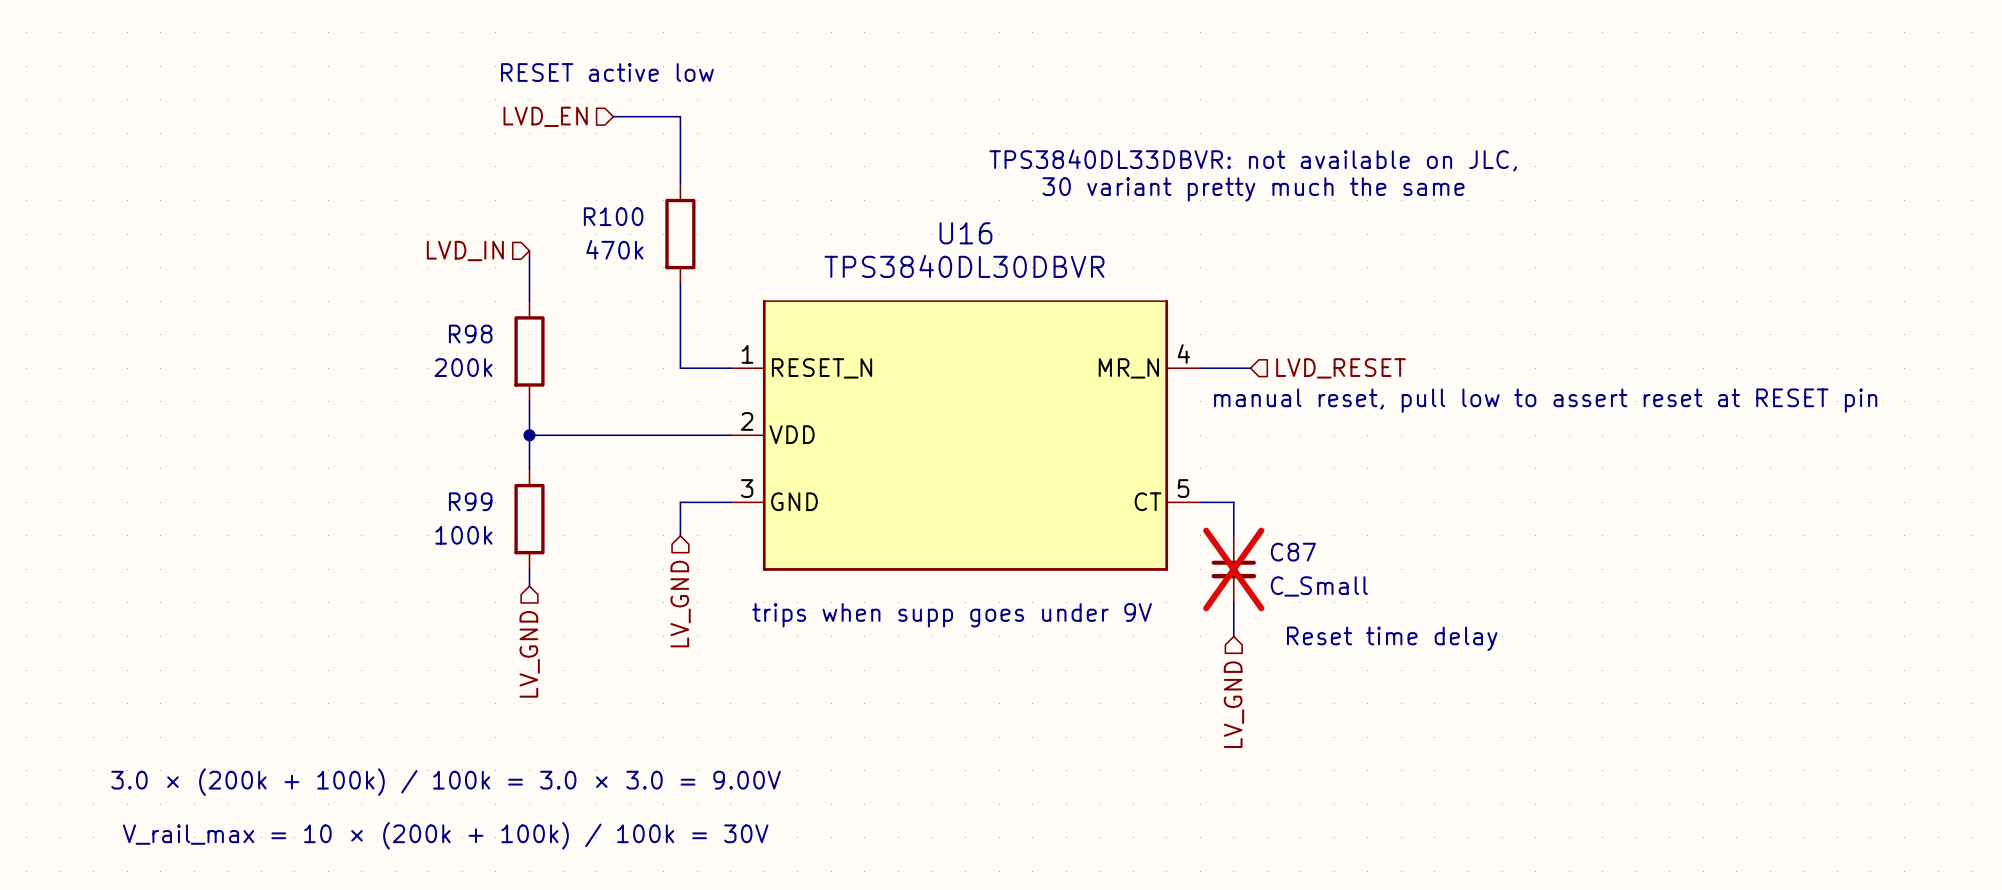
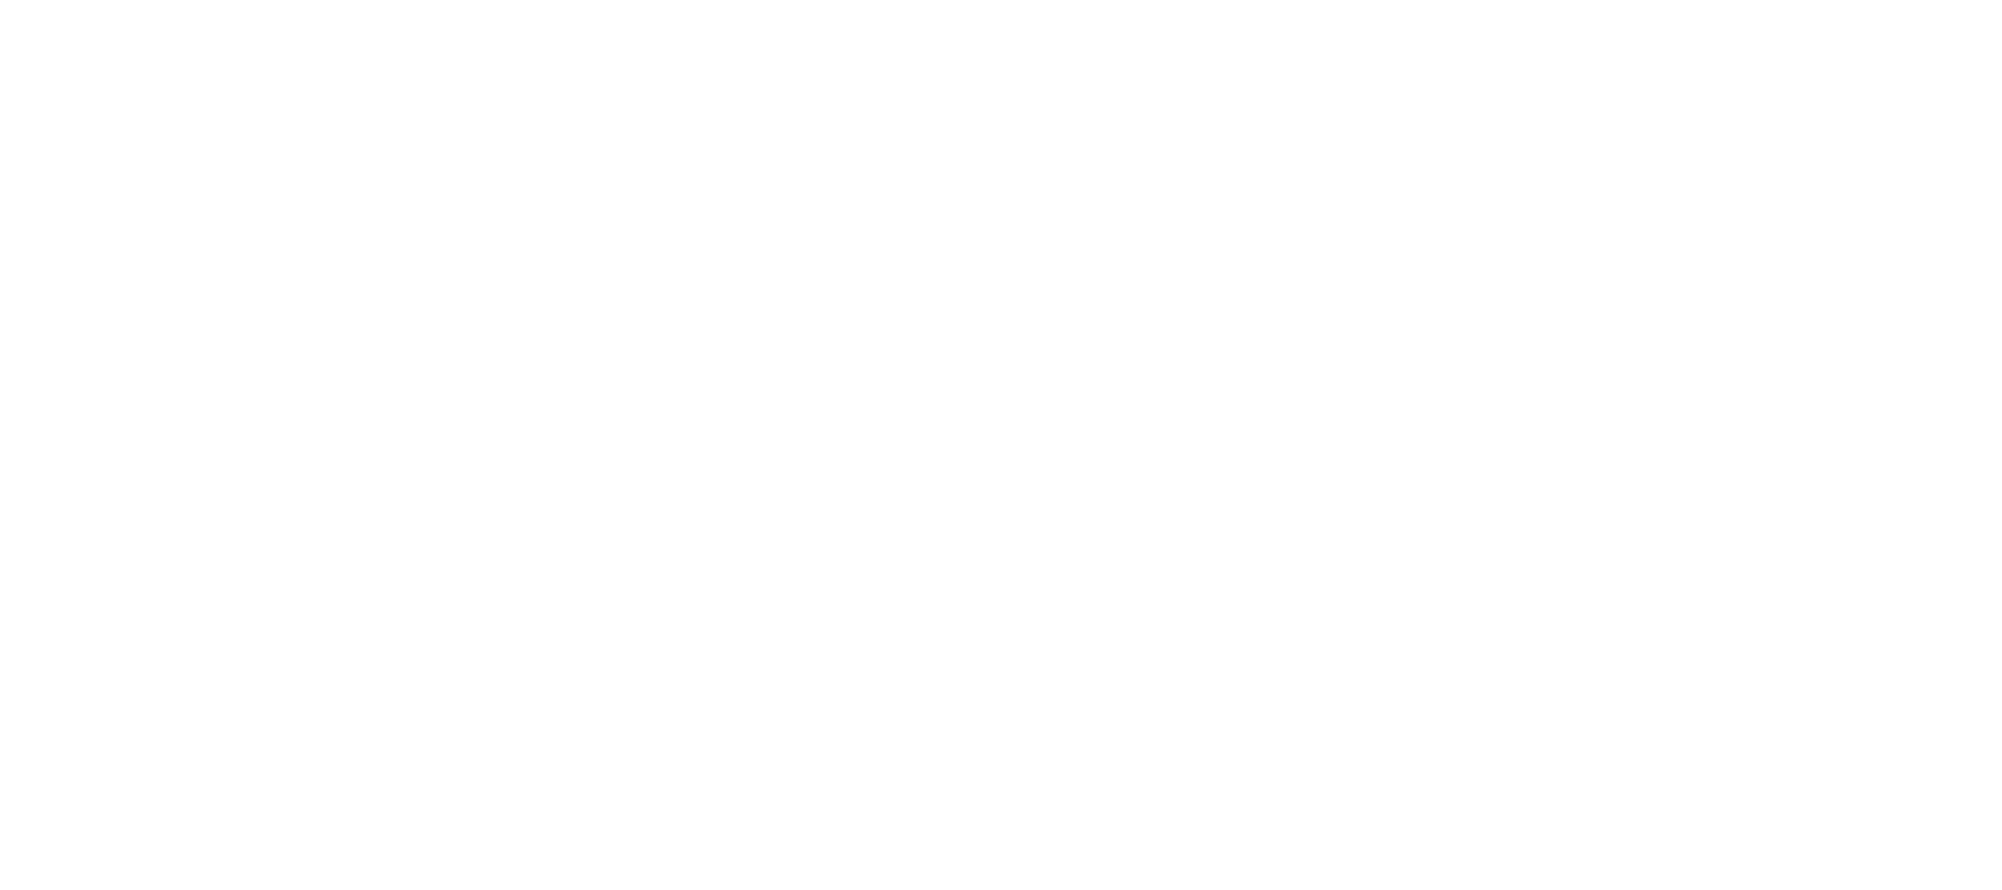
text: RESET active low (607, 72) -> none
hierarchical label: LVD_EN (545, 116) -> none
wire: (613, 116) (680, 116) (680, 183) -> none
text: TPS3840DL33DBVR: not available on JLC, (1253, 160) -> none
text: 30 variant pretty much the same (1253, 189) -> none
R100: 470k (680, 234) -> none
wire: (529, 250) (529, 301) -> none
hierarchical label: LVD_IN (465, 251) -> none
wire: (680, 284) (680, 368) (730, 368) -> none
R98: 200k (529, 351) -> none
wire: (1200, 368) (1250, 368) -> none
hierarchical label: LVD_RESET (1341, 368) -> none
text: manual reset, pull low to assert reset at RESET pin (1545, 400) -> none
wire: (529, 401) (529, 468) -> none
wire: (529, 435) (730, 435) -> none
junction: (529, 435) -> none
U16: TPS3840DL30DBVR (965, 435) -> none
wire: (730, 502) (680, 502) (680, 535) -> none
wire: (1200, 502) (1233, 502) (1233, 535) -> none
R99: 100k (529, 519) -> none
wire: (529, 569) (529, 586) -> none
C87: C_Small (1233, 569) -> none
wire: (1233, 602) (1233, 636) -> none
hierarchical label: LV_GND (680, 604) -> none
text: trips when supp goes under 9V (952, 615) -> none
text: Reset time delay (1392, 638) -> none
hierarchical label: LV_GND (529, 654) -> none
hierarchical label: LV_GND (1233, 704) -> none
text: 3.0 × (200k + 100k) / 100k = 3.0 × 3.0 = 9.00V (446, 782) -> none
text: V_rail_max = 10 × (200k + 100k) / 100k = 30V (445, 835) -> none

